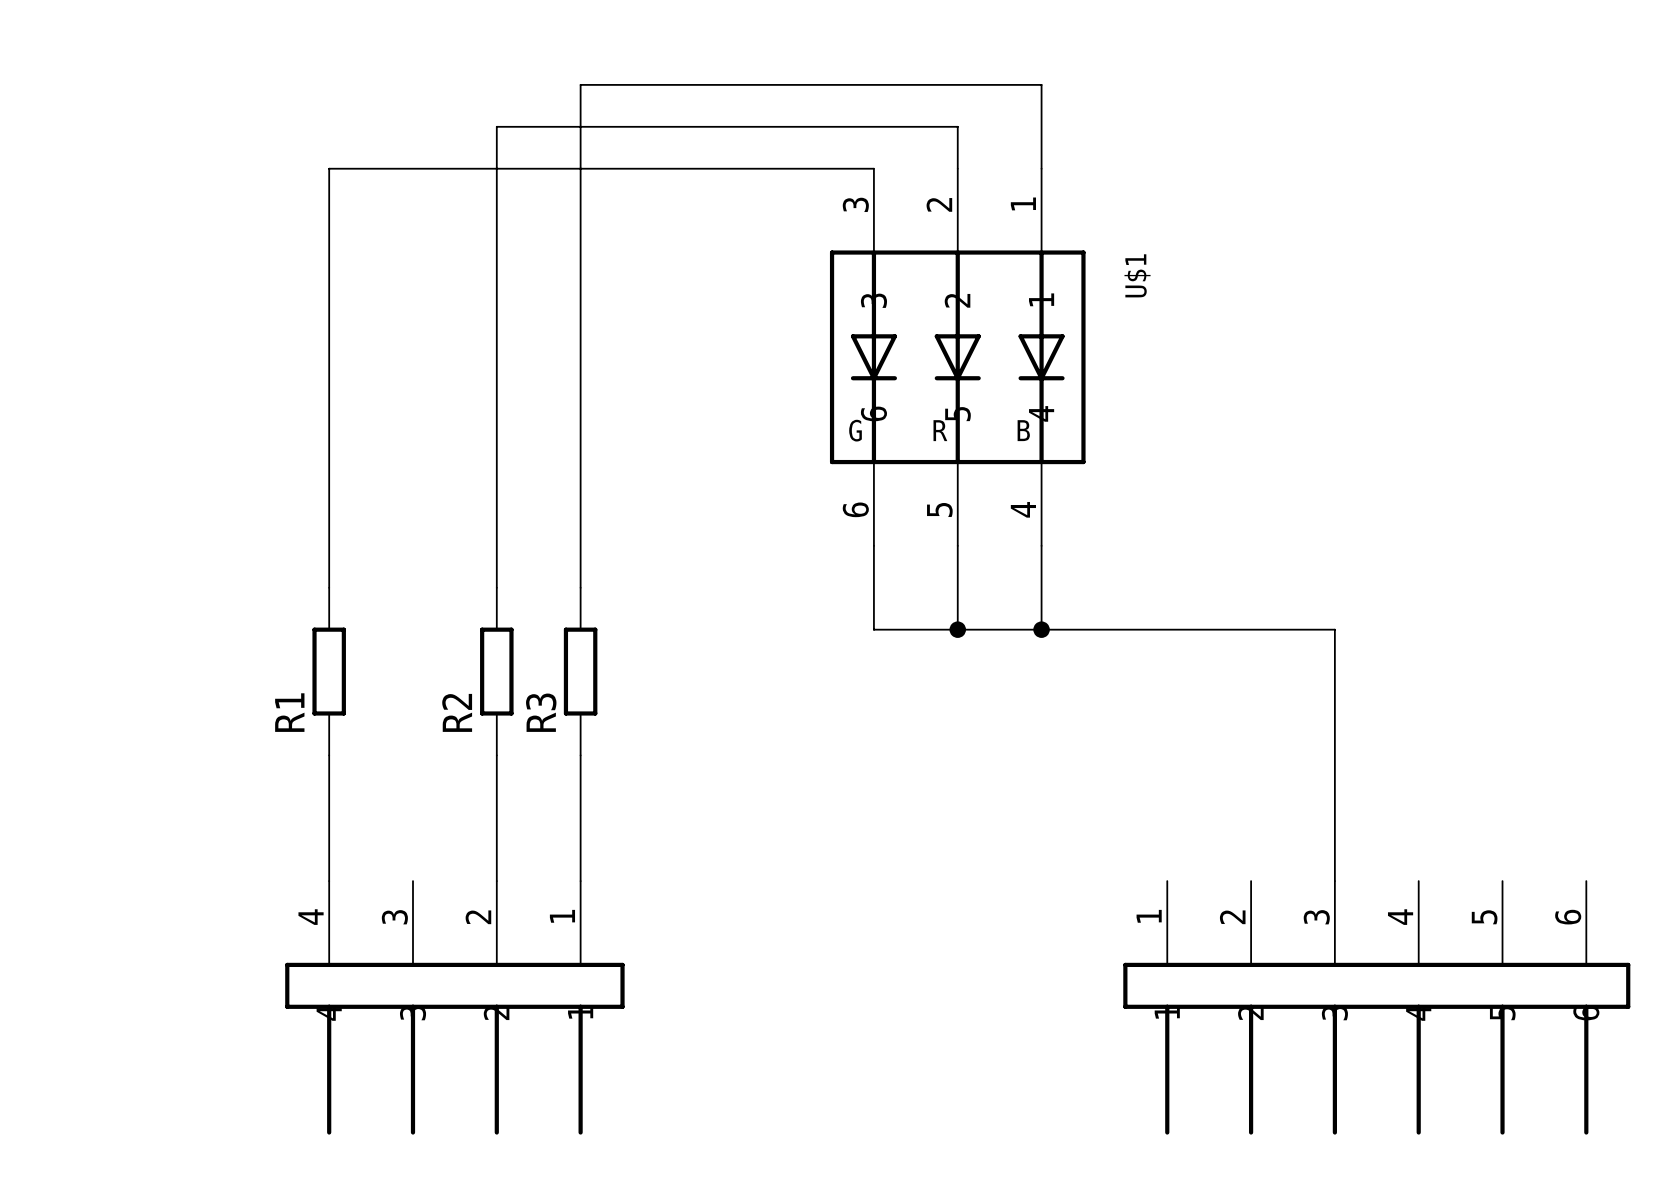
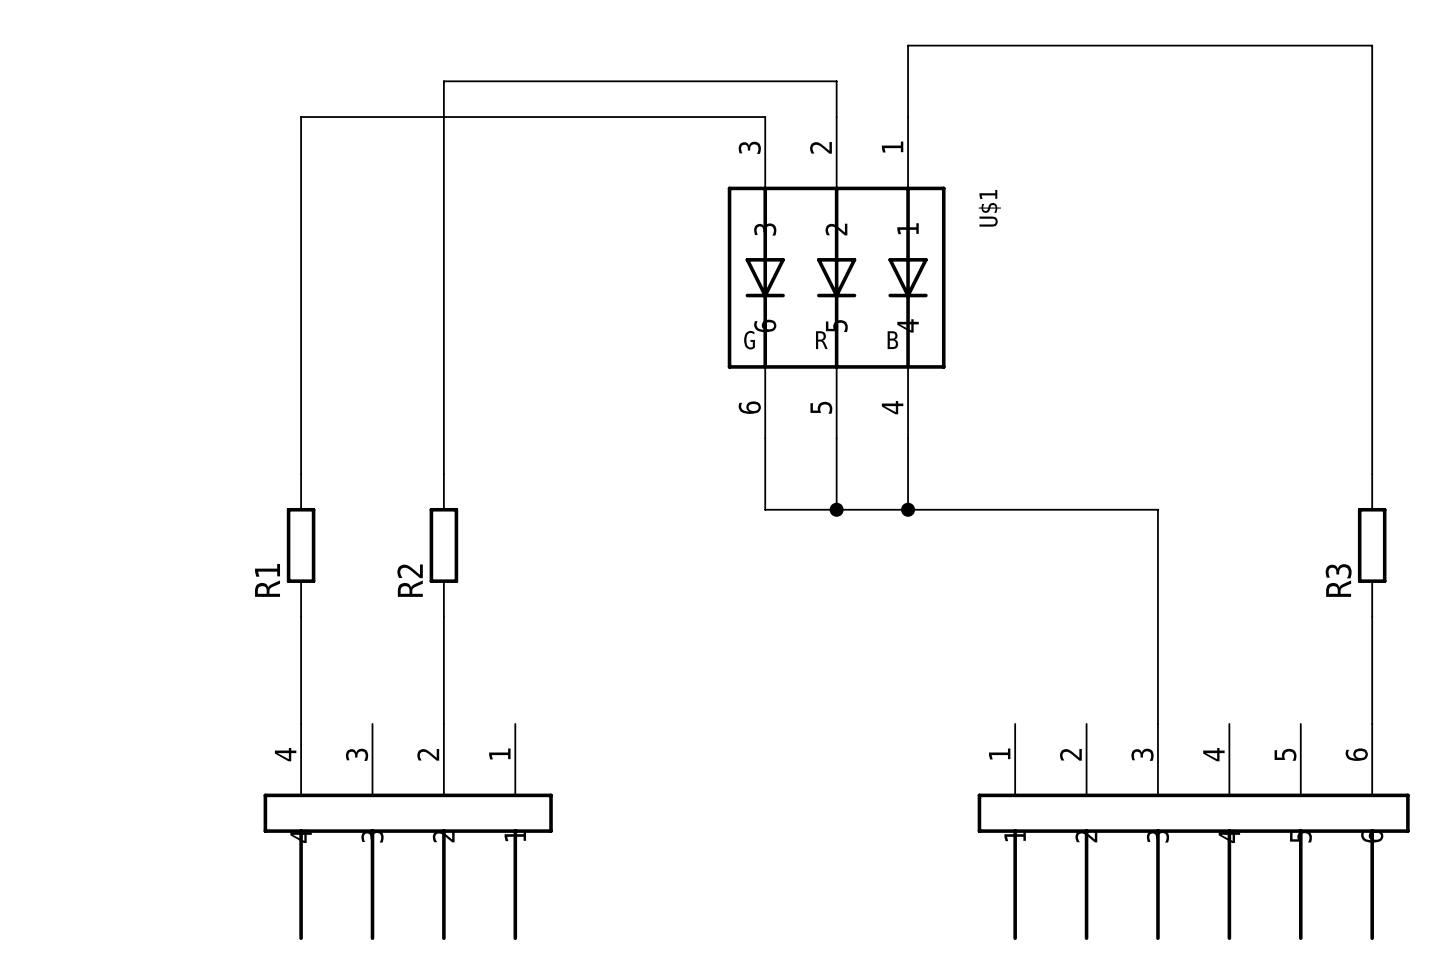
wire: (1041, 84) (580, 84) (580, 587) -> (908, 45) (1372, 45) (1372, 474)
R3 position: (580, 671) -> (1372, 545)
wire: (580, 755) (580, 881) -> none
wire: none -> (1372, 616) (1372, 723)

